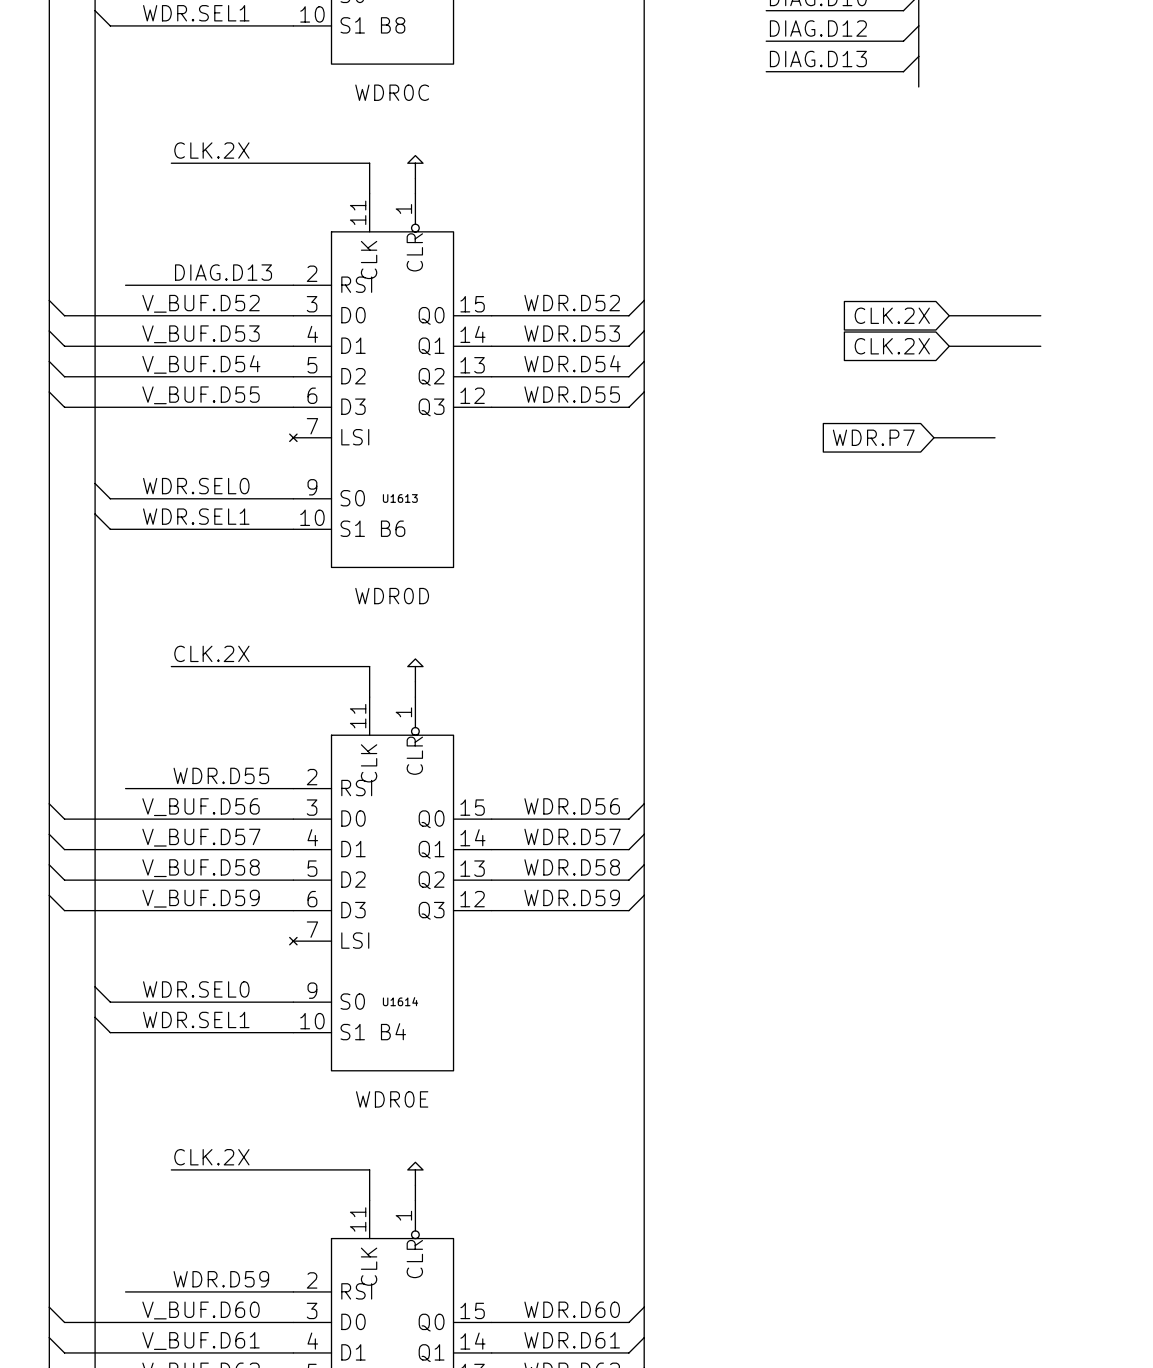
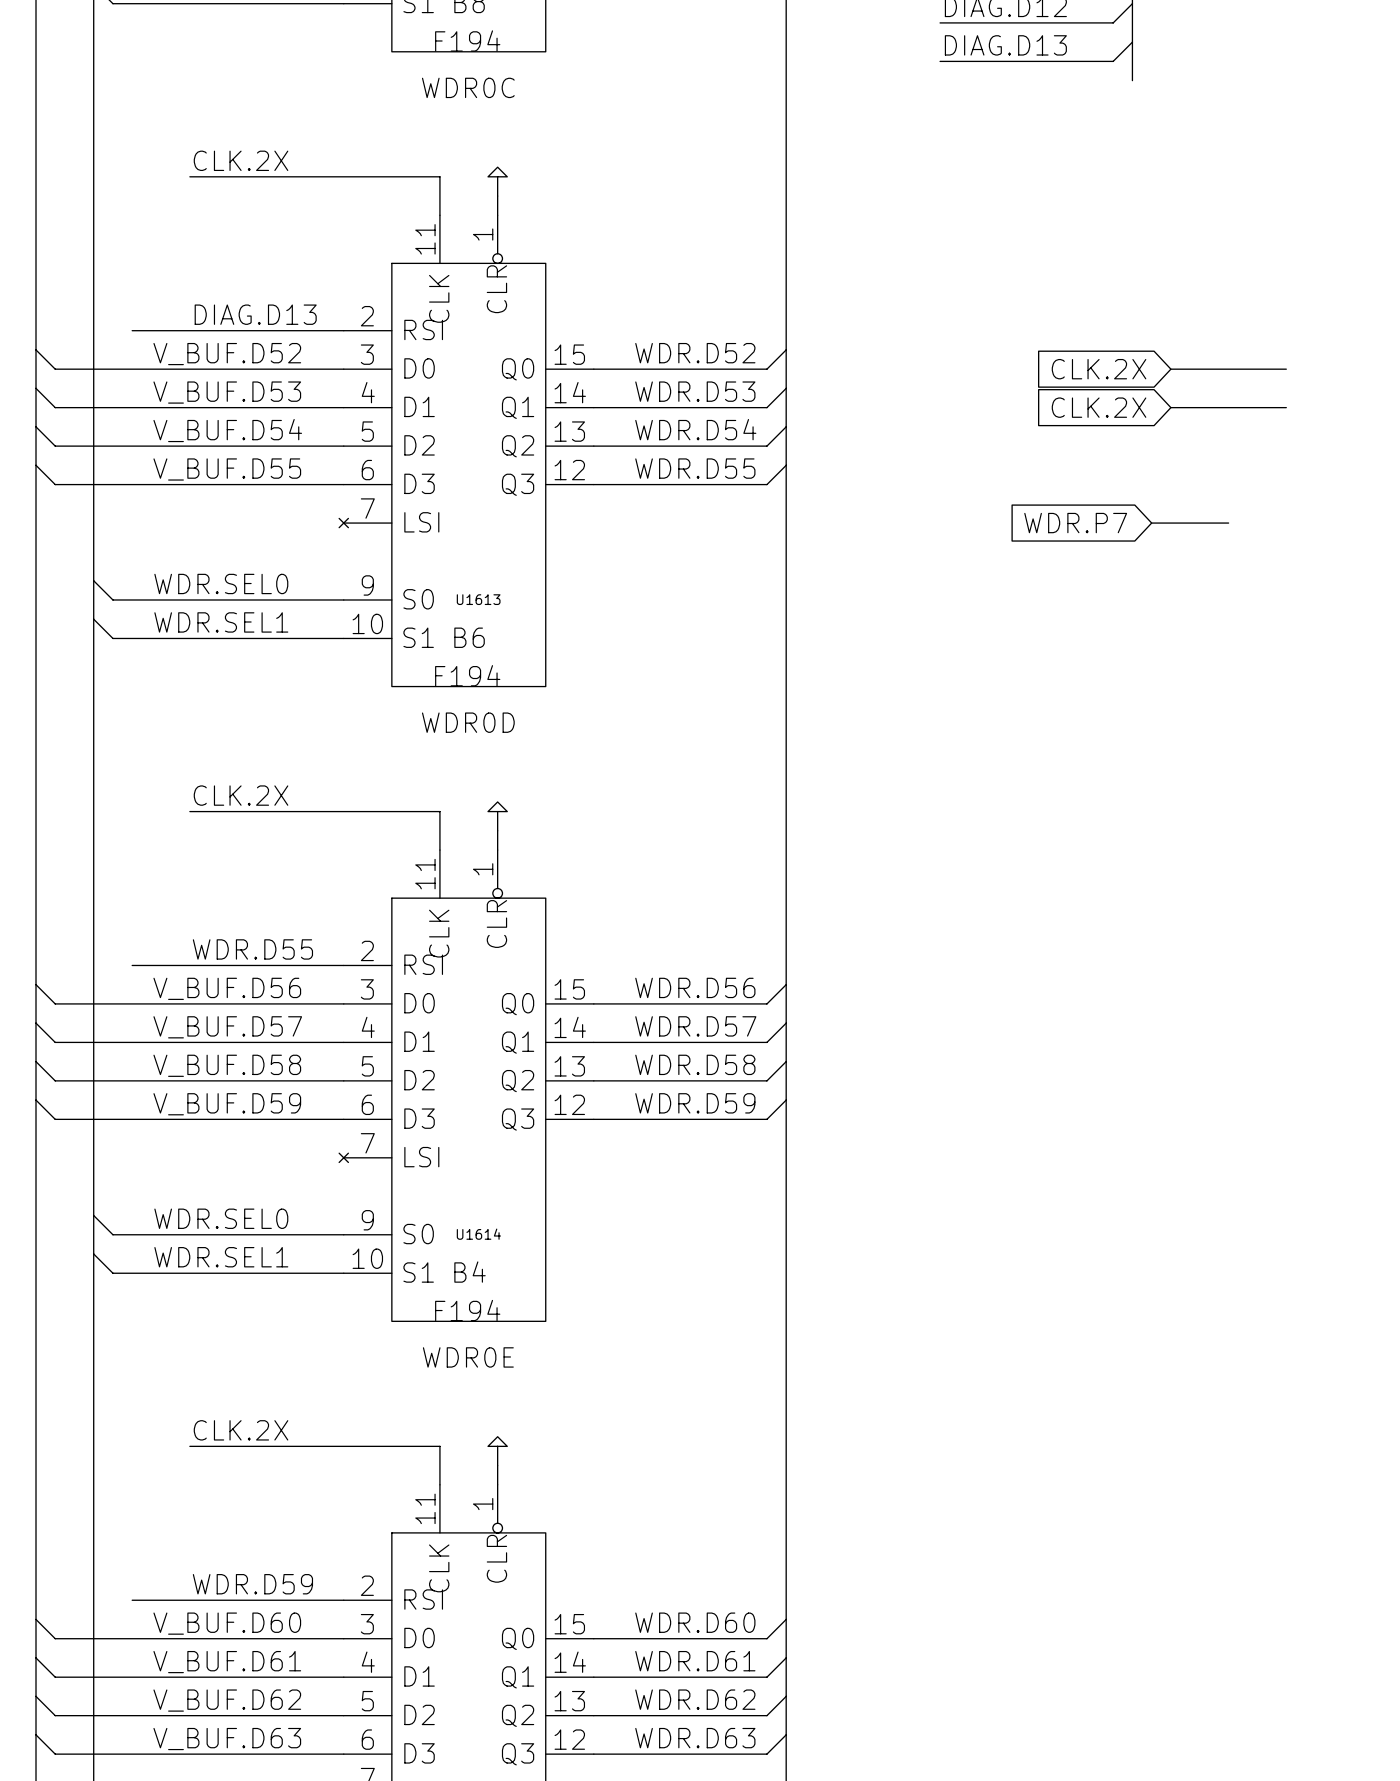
part value: none -> F194 (467, 40)
U1613 value: none -> F194 (467, 675)
U1614 value: none -> F194 (467, 1310)

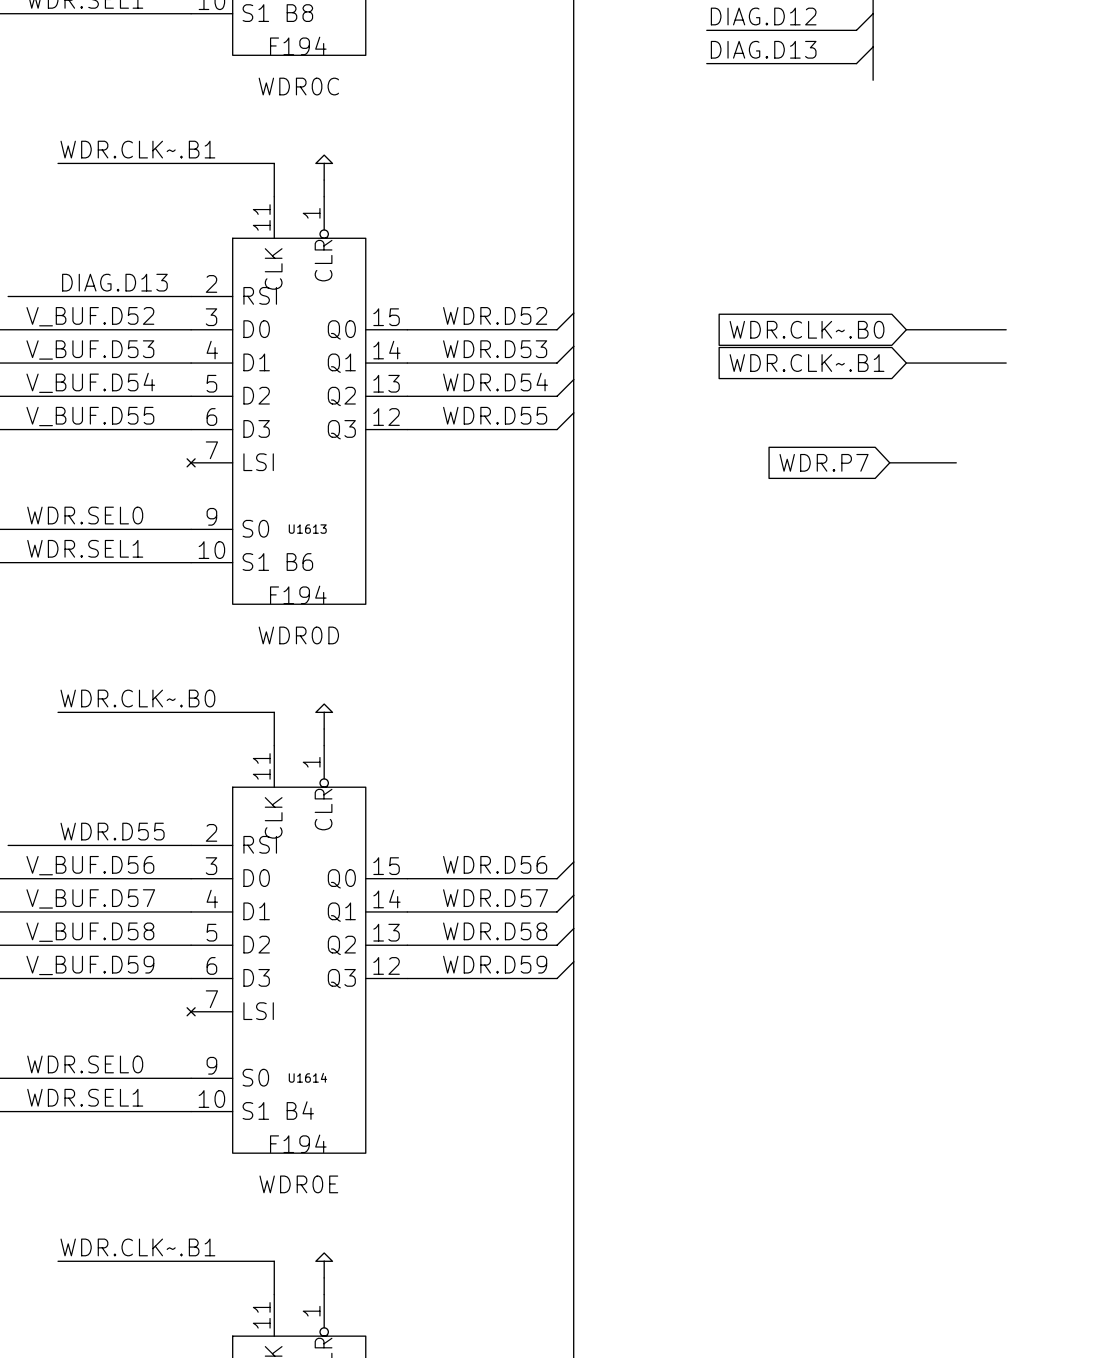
label: CLK.2X (241, 160) -> WDR.CLK~.B1 (137, 149)
global label: CLK.2X (1099, 369) -> WDR.CLK~.B0 (807, 329)
global label: CLK.2X (1099, 407) -> WDR.CLK~.B1 (807, 363)
label: CLK.2X (241, 795) -> WDR.CLK~.B0 (137, 698)
label: CLK.2X (241, 1430) -> WDR.CLK~.B1 (137, 1247)

